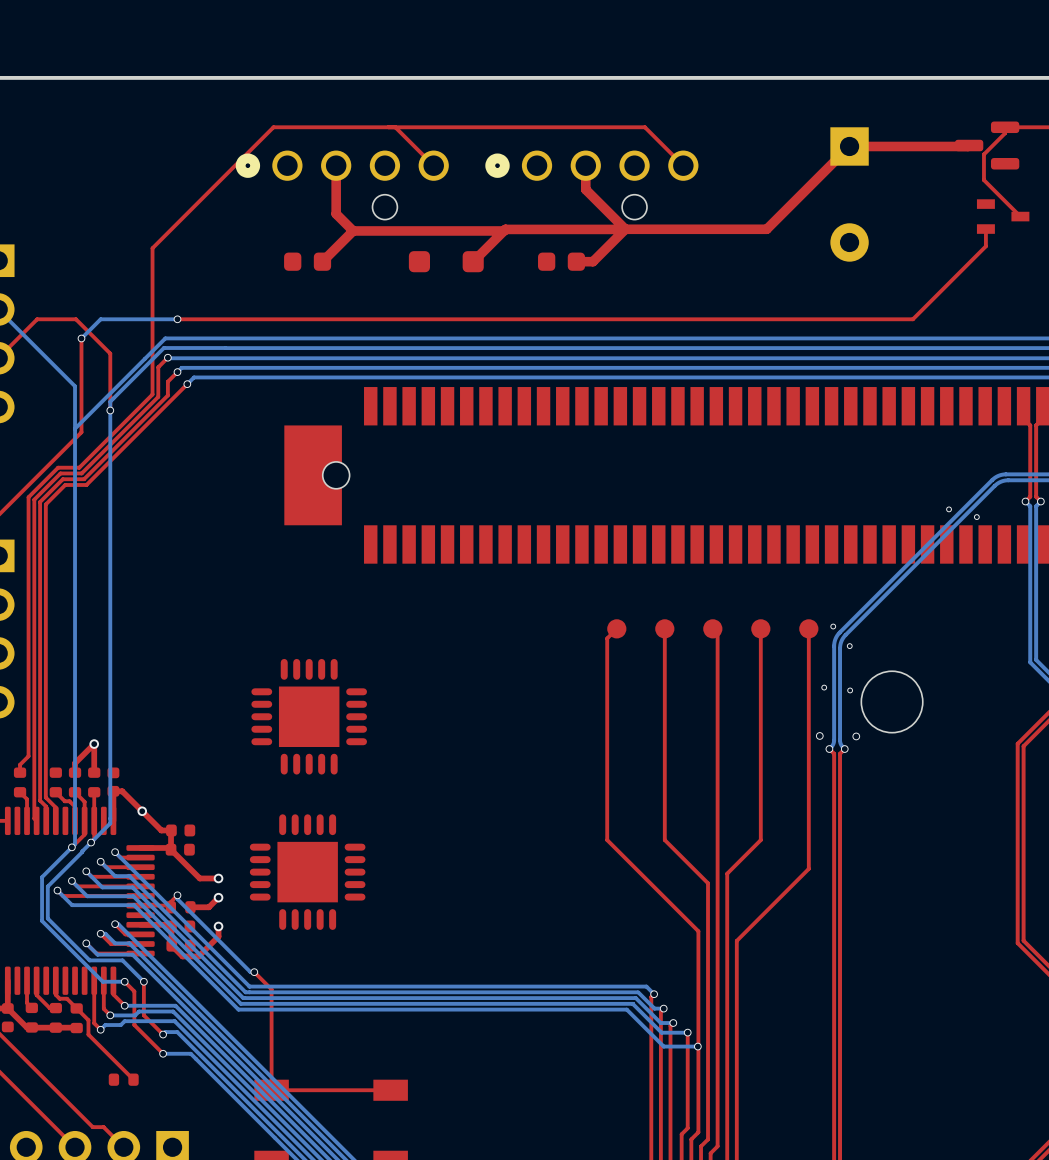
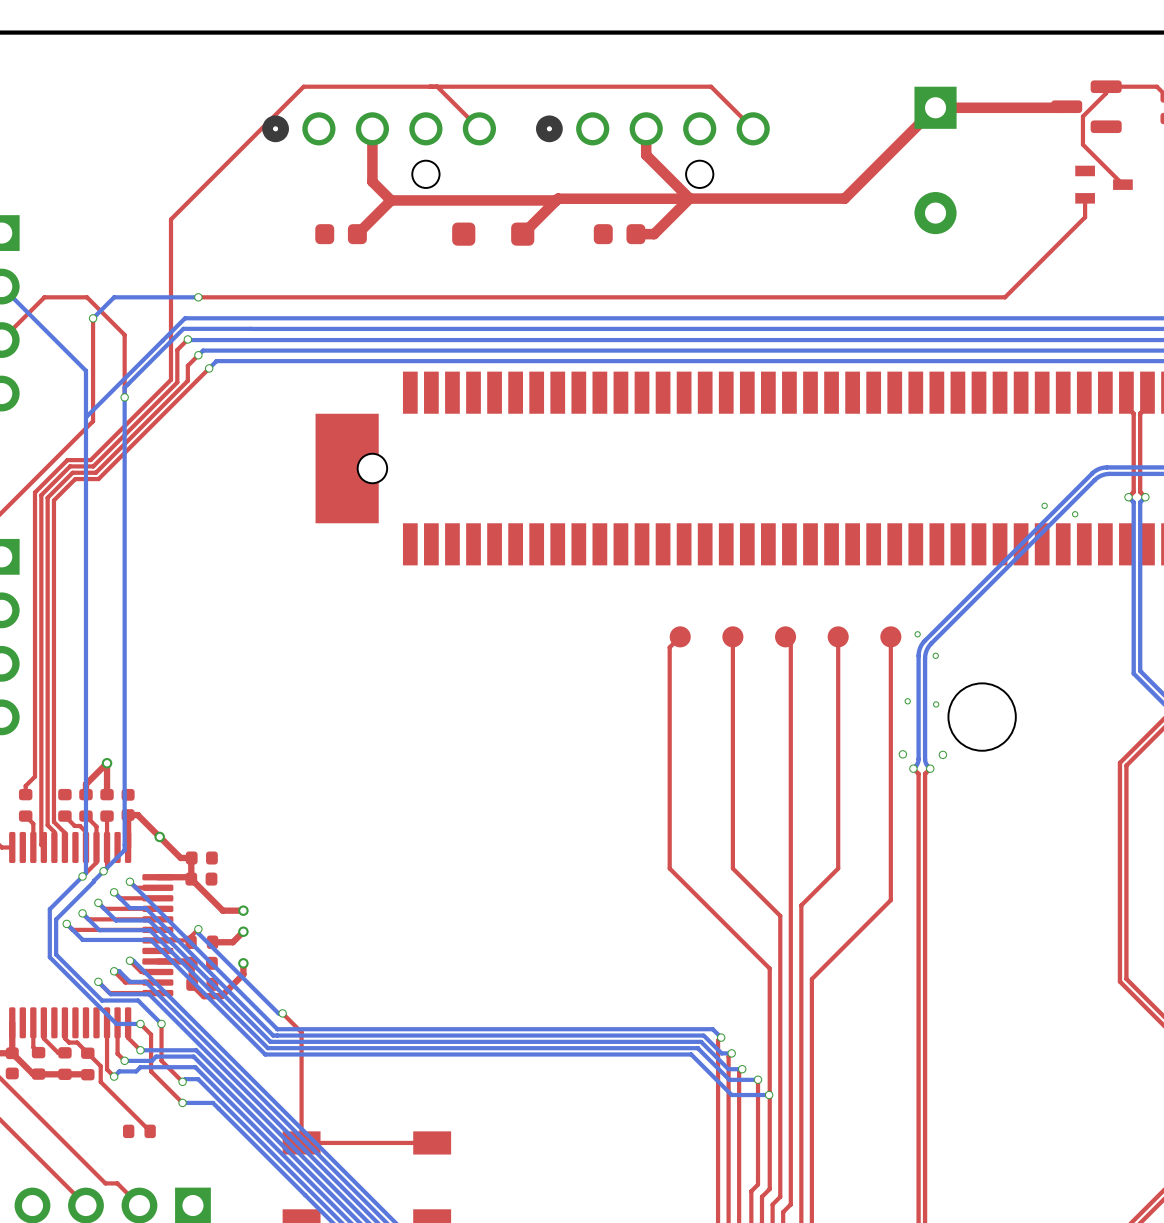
part: (309, 716) -> none
part: (307, 872) -> none

